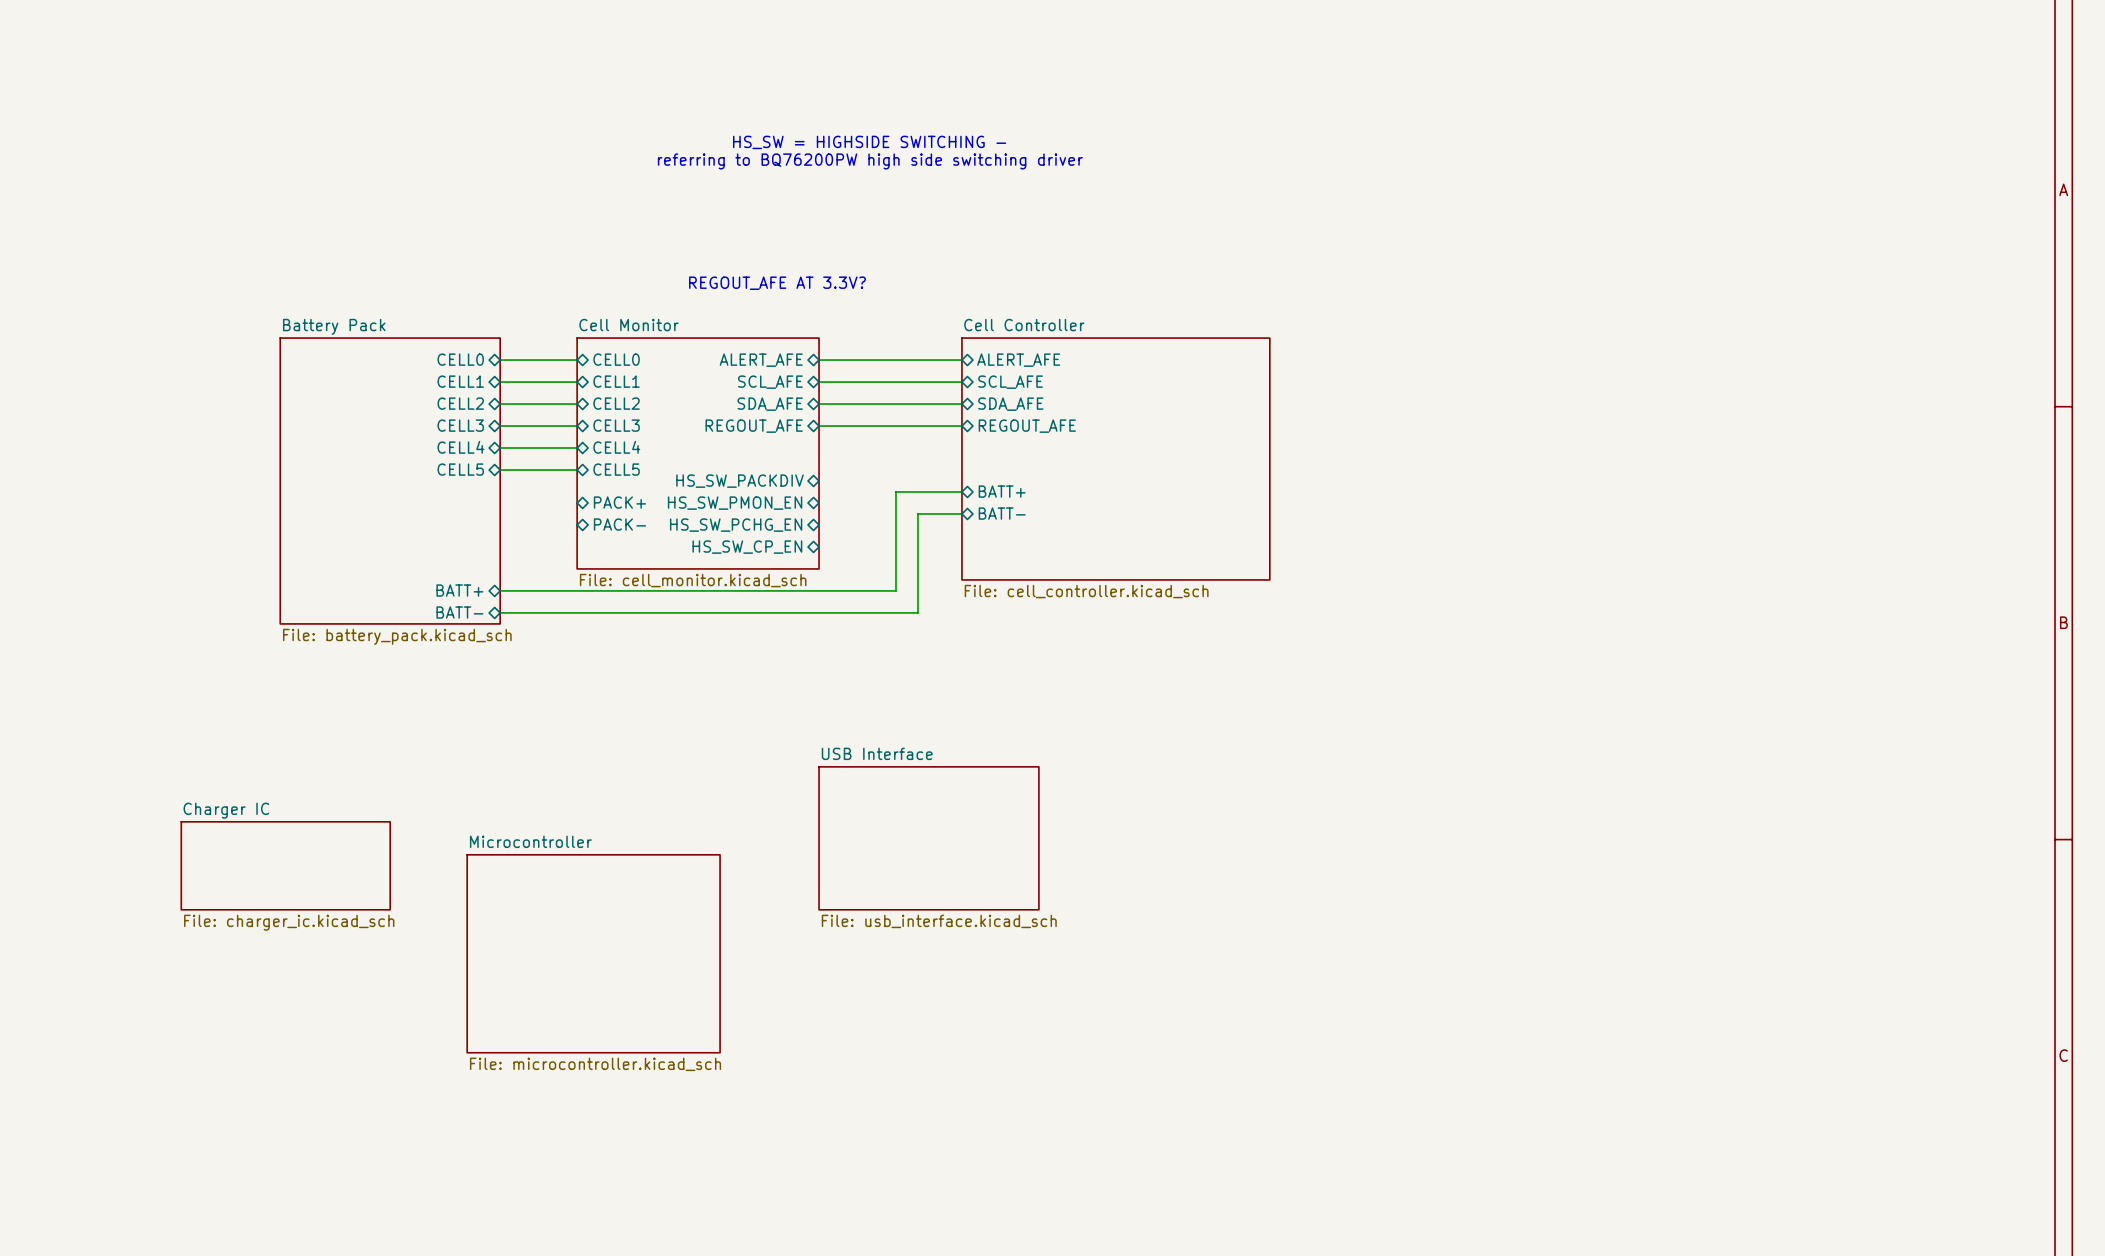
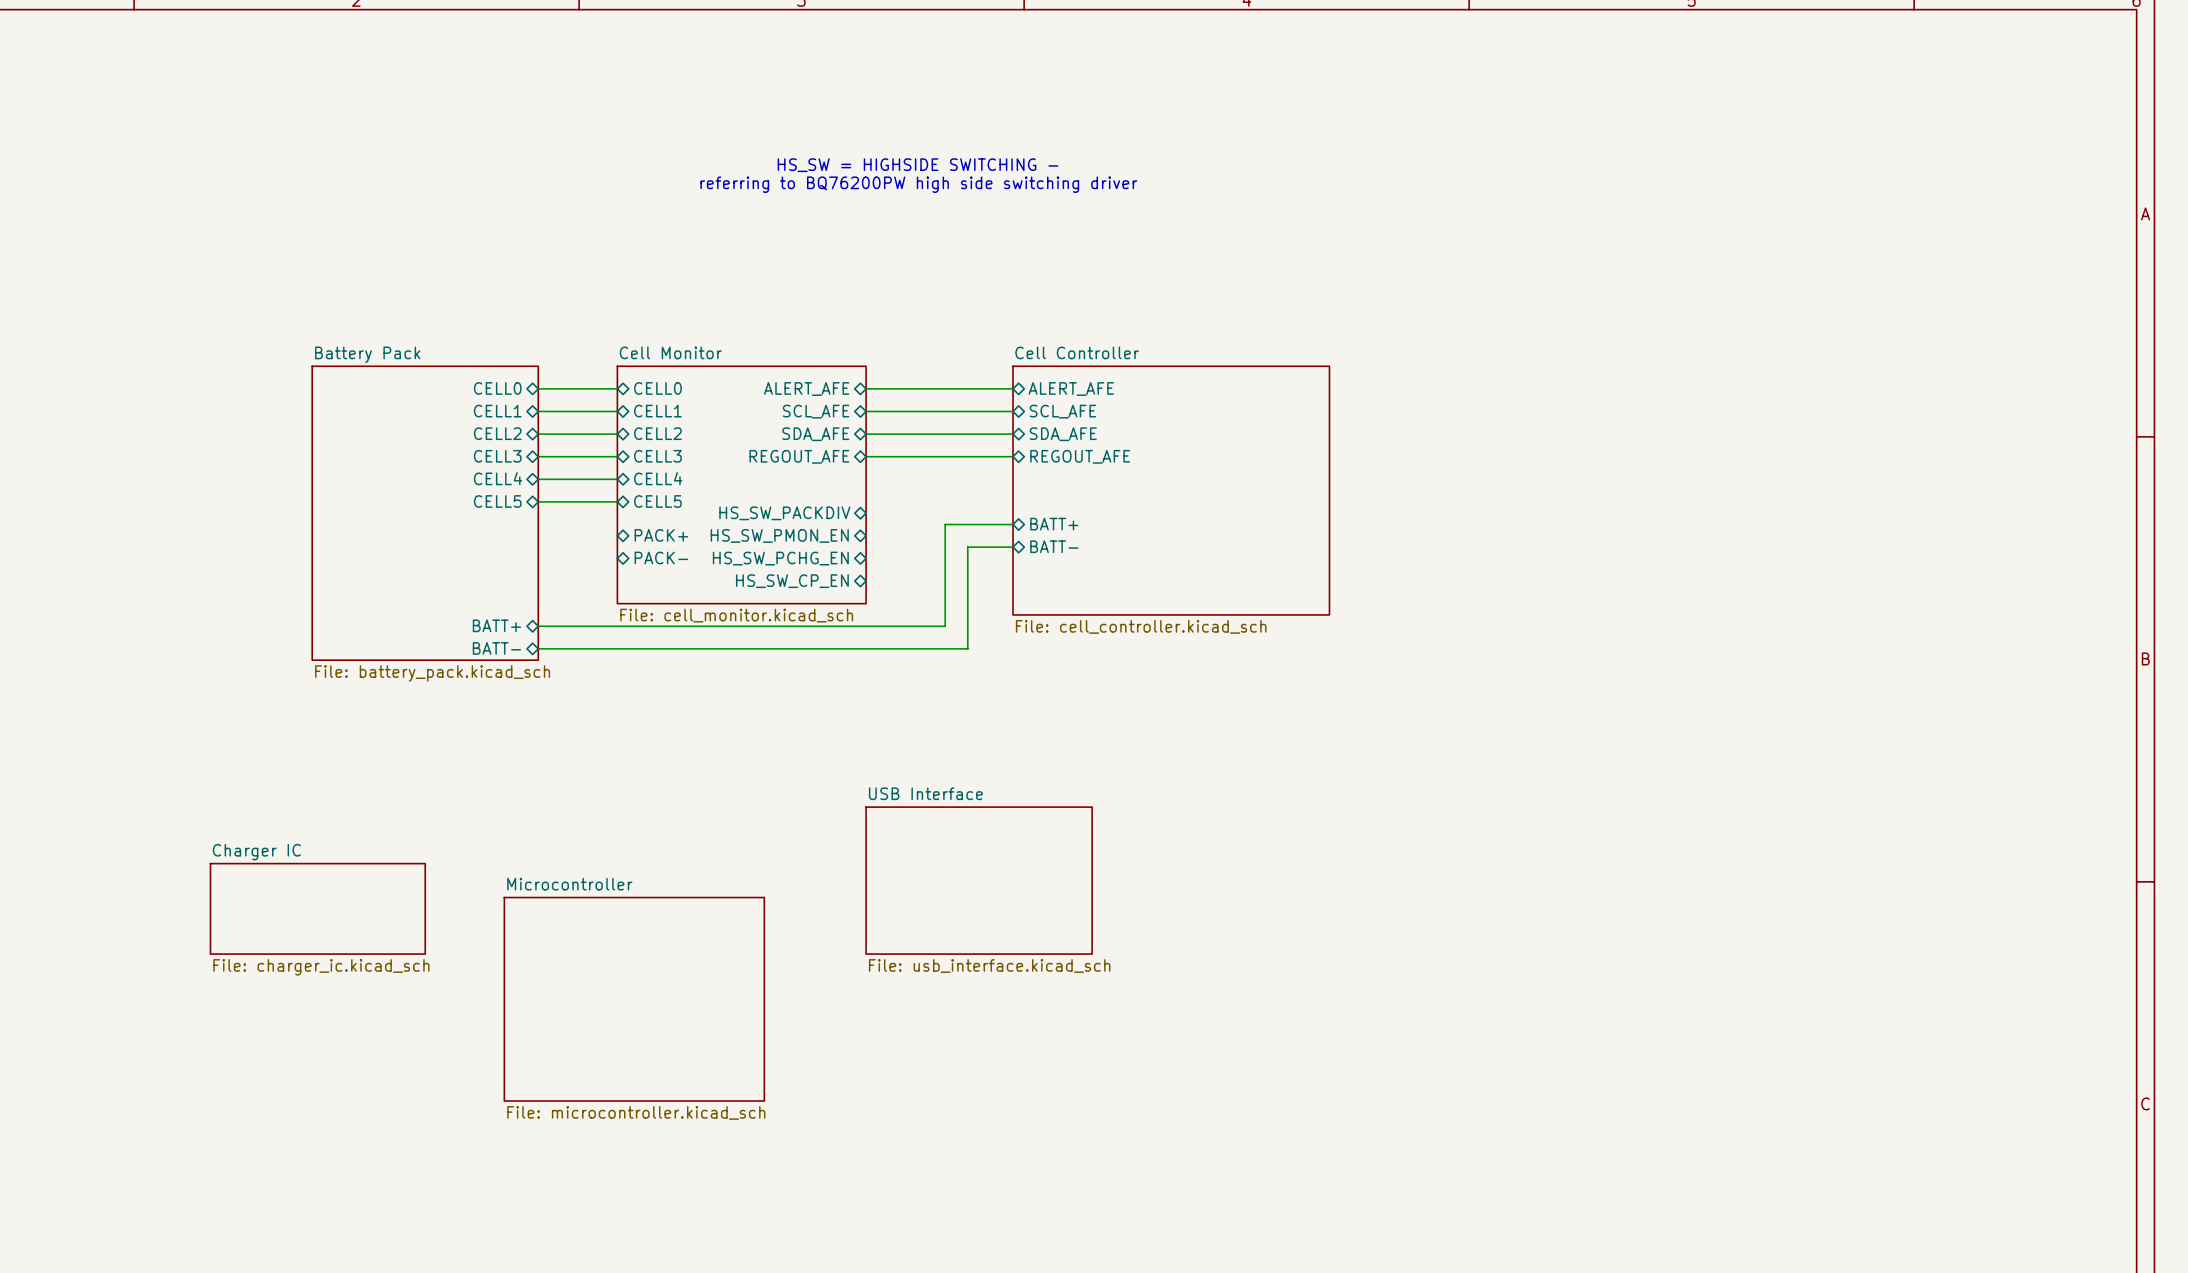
text: REGOUT_AFE AT 3.3V? (777, 283) -> none

